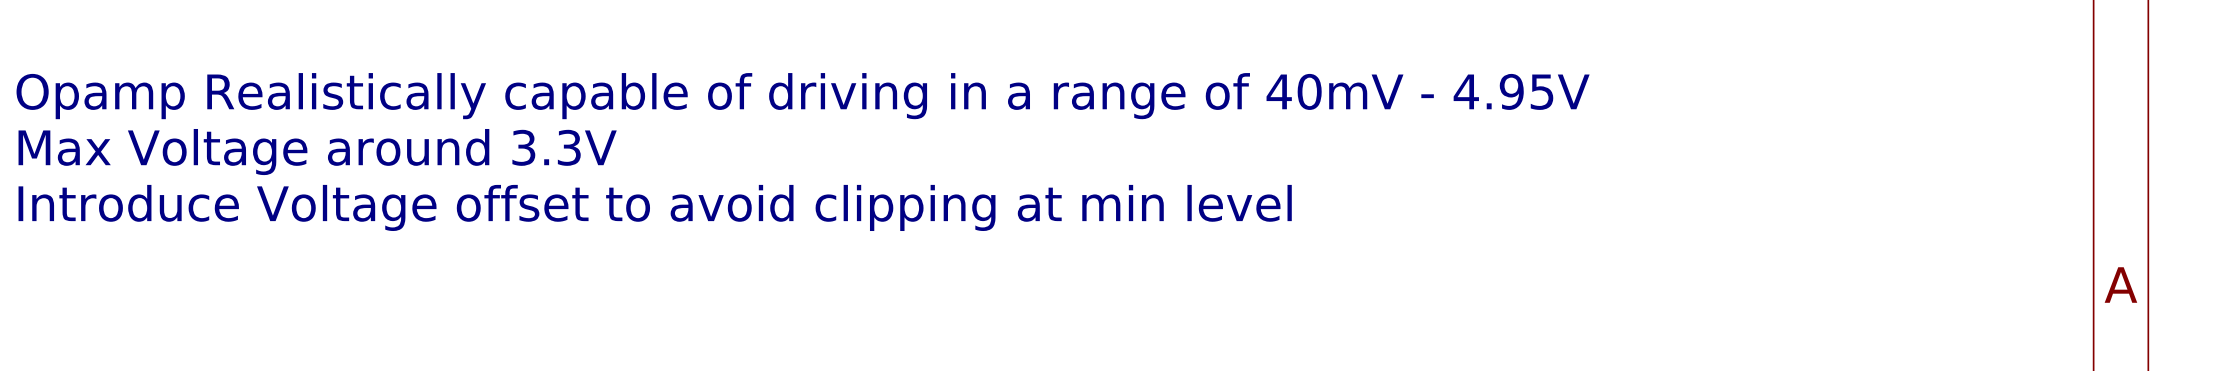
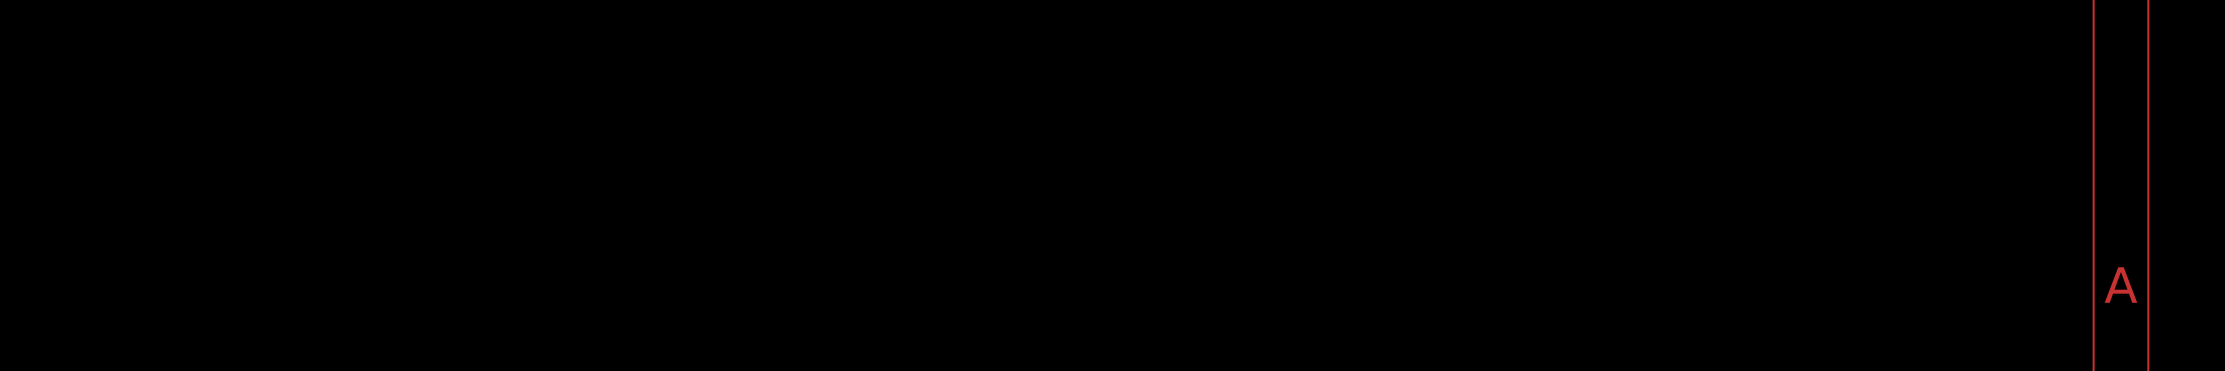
text: Opamp Realistically capable of driving in a range of 40mV - 4.95V (803, 96) -> none
text: Max Voltage around 3.3V (317, 152) -> none
text: Introduce Voltage offset to avoid clipping at min level (655, 207) -> none

